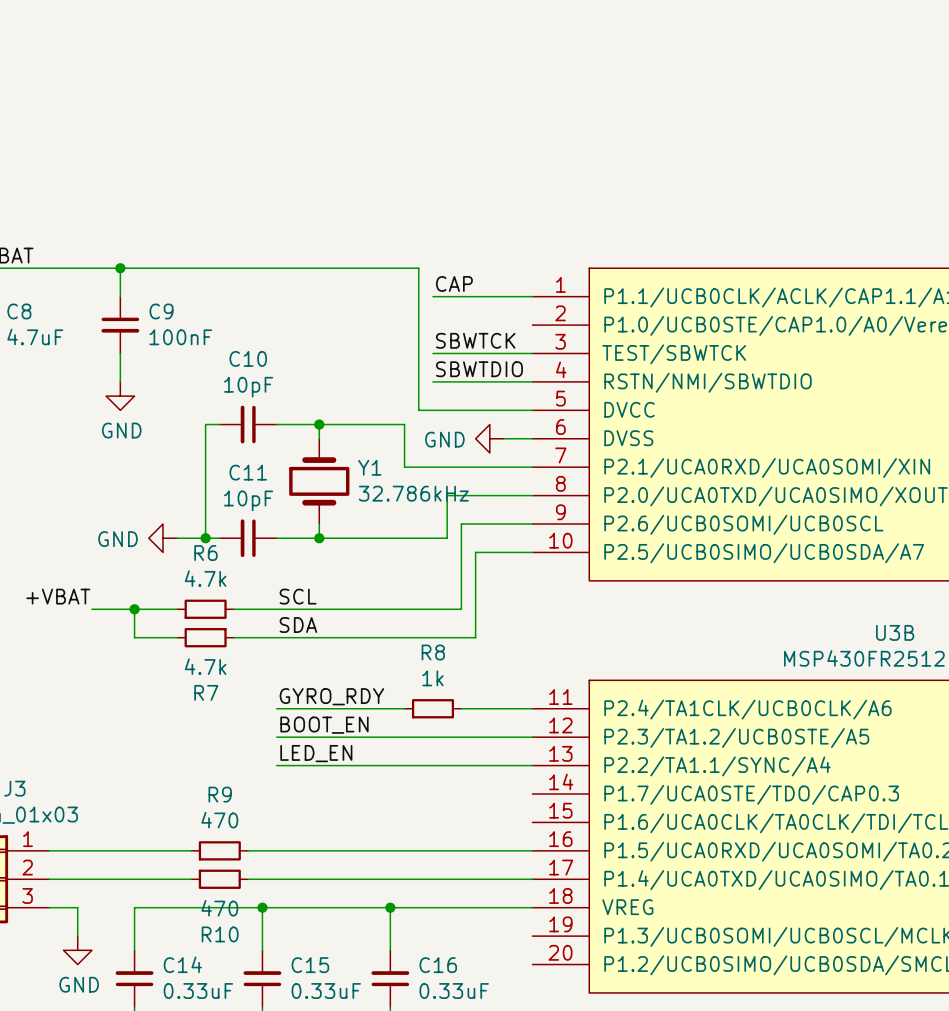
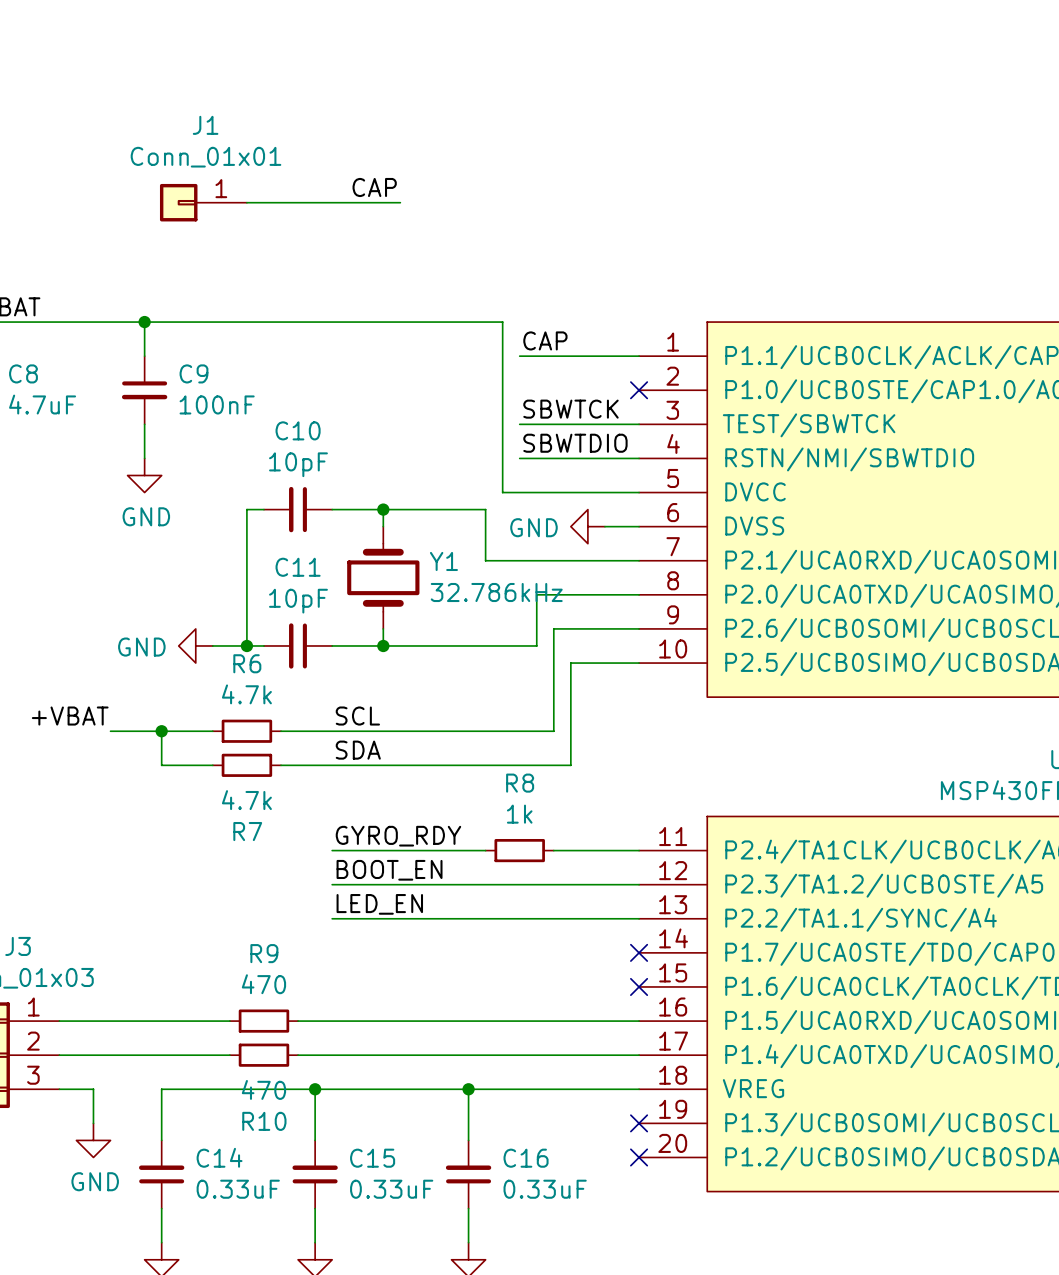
label: none -> CAP (374, 187)
J1: none -> Conn_01x01 (203, 202)
wire: none -> (246, 202) (400, 202)
no-connect mark: none -> (639, 390)
no-connect mark: none -> (639, 952)
no-connect mark: none -> (639, 986)
no-connect mark: none -> (639, 1123)
no-connect mark: none -> (639, 1157)

